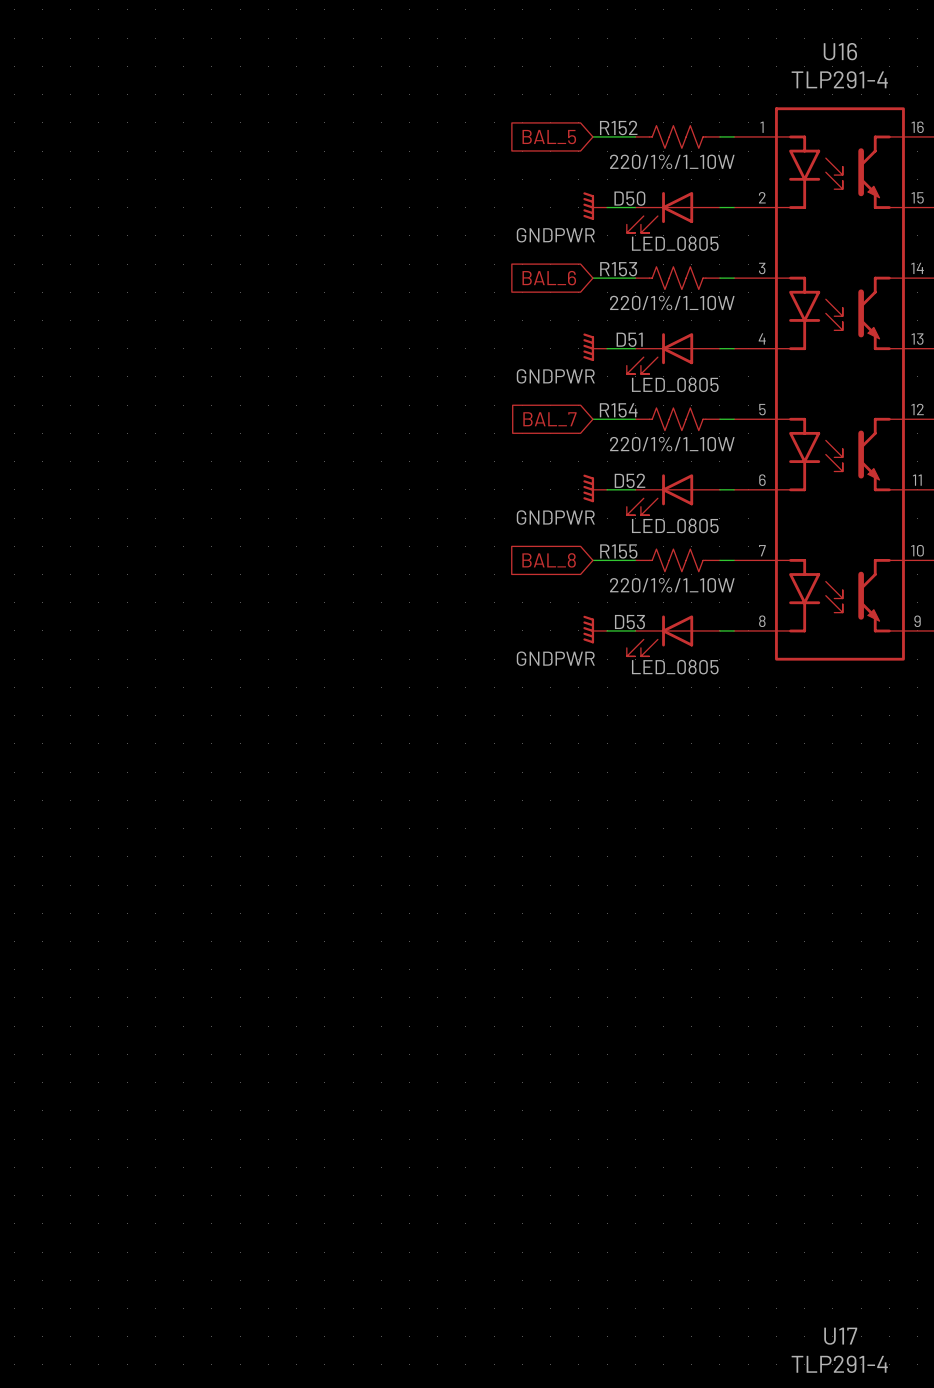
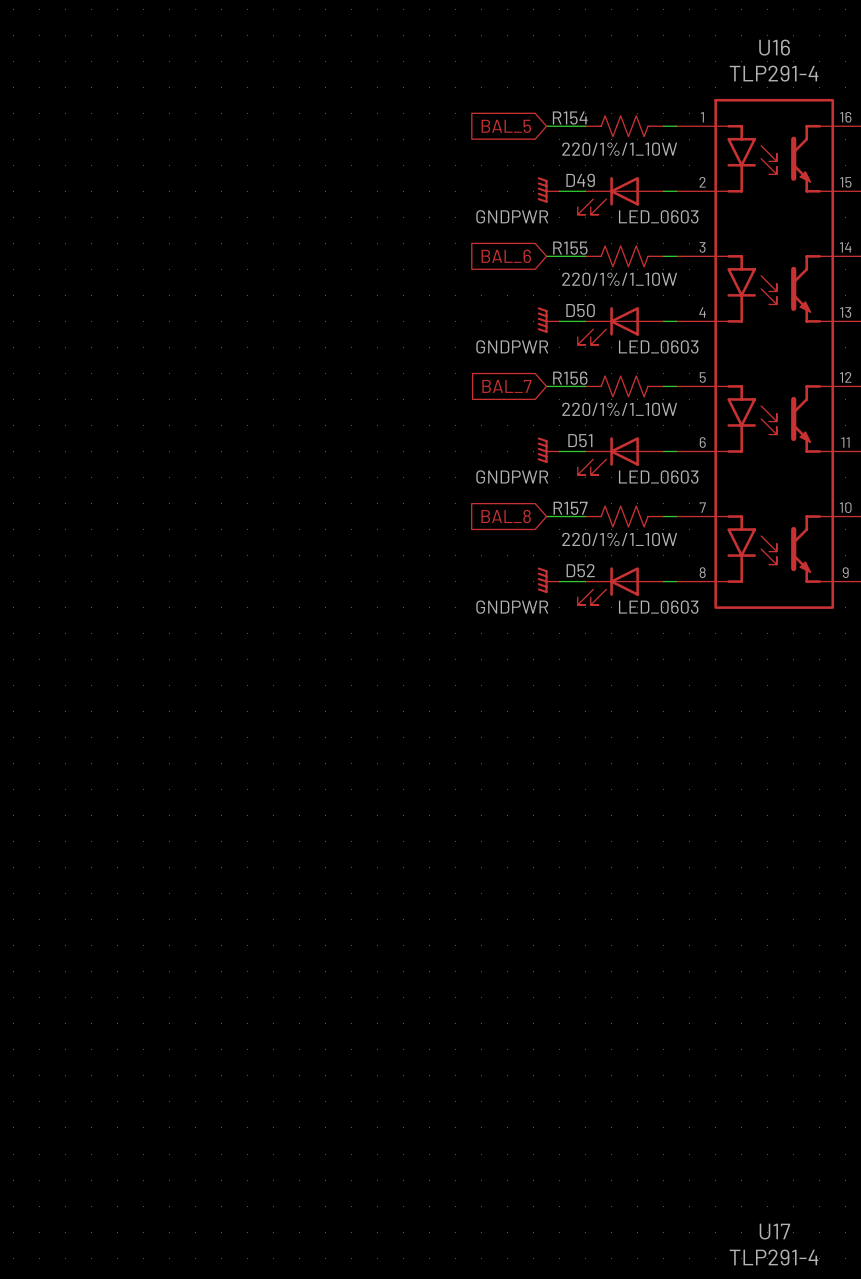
R152 name: R152 (618, 127) -> R154 (570, 118)
D50 name: D50 (629, 198) -> D49 (580, 180)
D50 value: LED_0805 (675, 243) -> LED_0603 (658, 216)
R153 name: R153 (618, 269) -> R155 (570, 248)
D51 name: D51 (629, 339) -> D50 (580, 310)
D51 value: LED_0805 (675, 384) -> LED_0603 (658, 346)
R154 name: R154 (618, 410) -> R156 (570, 378)
D52 name: D52 (630, 480) -> D51 (580, 440)
D52 value: LED_0805 (675, 526) -> LED_0603 (658, 477)
R155 name: R155 (618, 551) -> R157 (570, 508)
D53 name: D53 (629, 622) -> D52 (580, 570)
D53 value: LED_0805 (675, 667) -> LED_0603 (658, 607)

